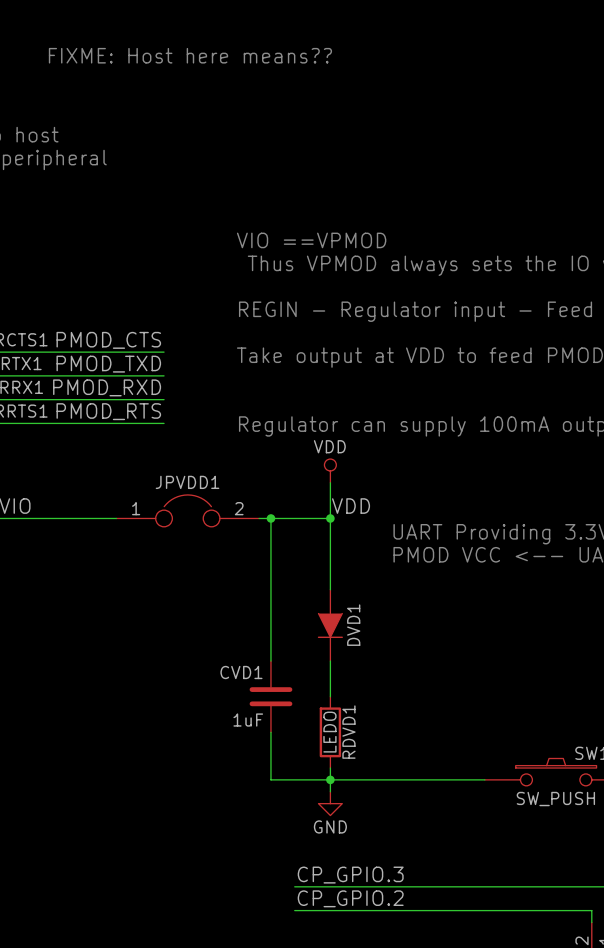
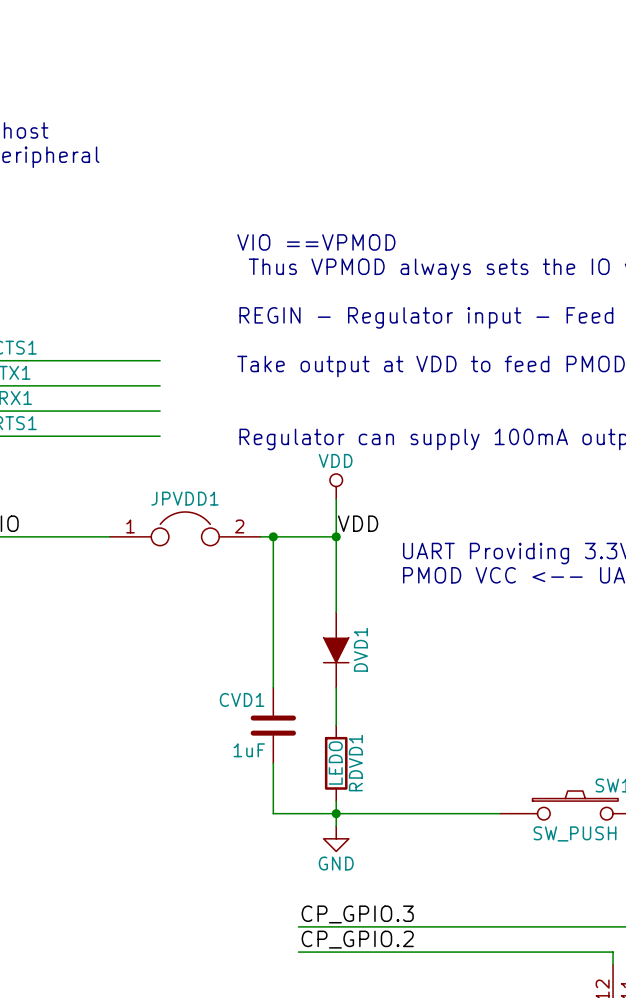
text: FIXME: Host here means?? (190, 55) -> none
label: PMOD_CTS (108, 340) -> none
label: PMOD_TXD (108, 364) -> none
label: PMOD_RXD (107, 387) -> none
label: PMOD_RTS (108, 411) -> none

